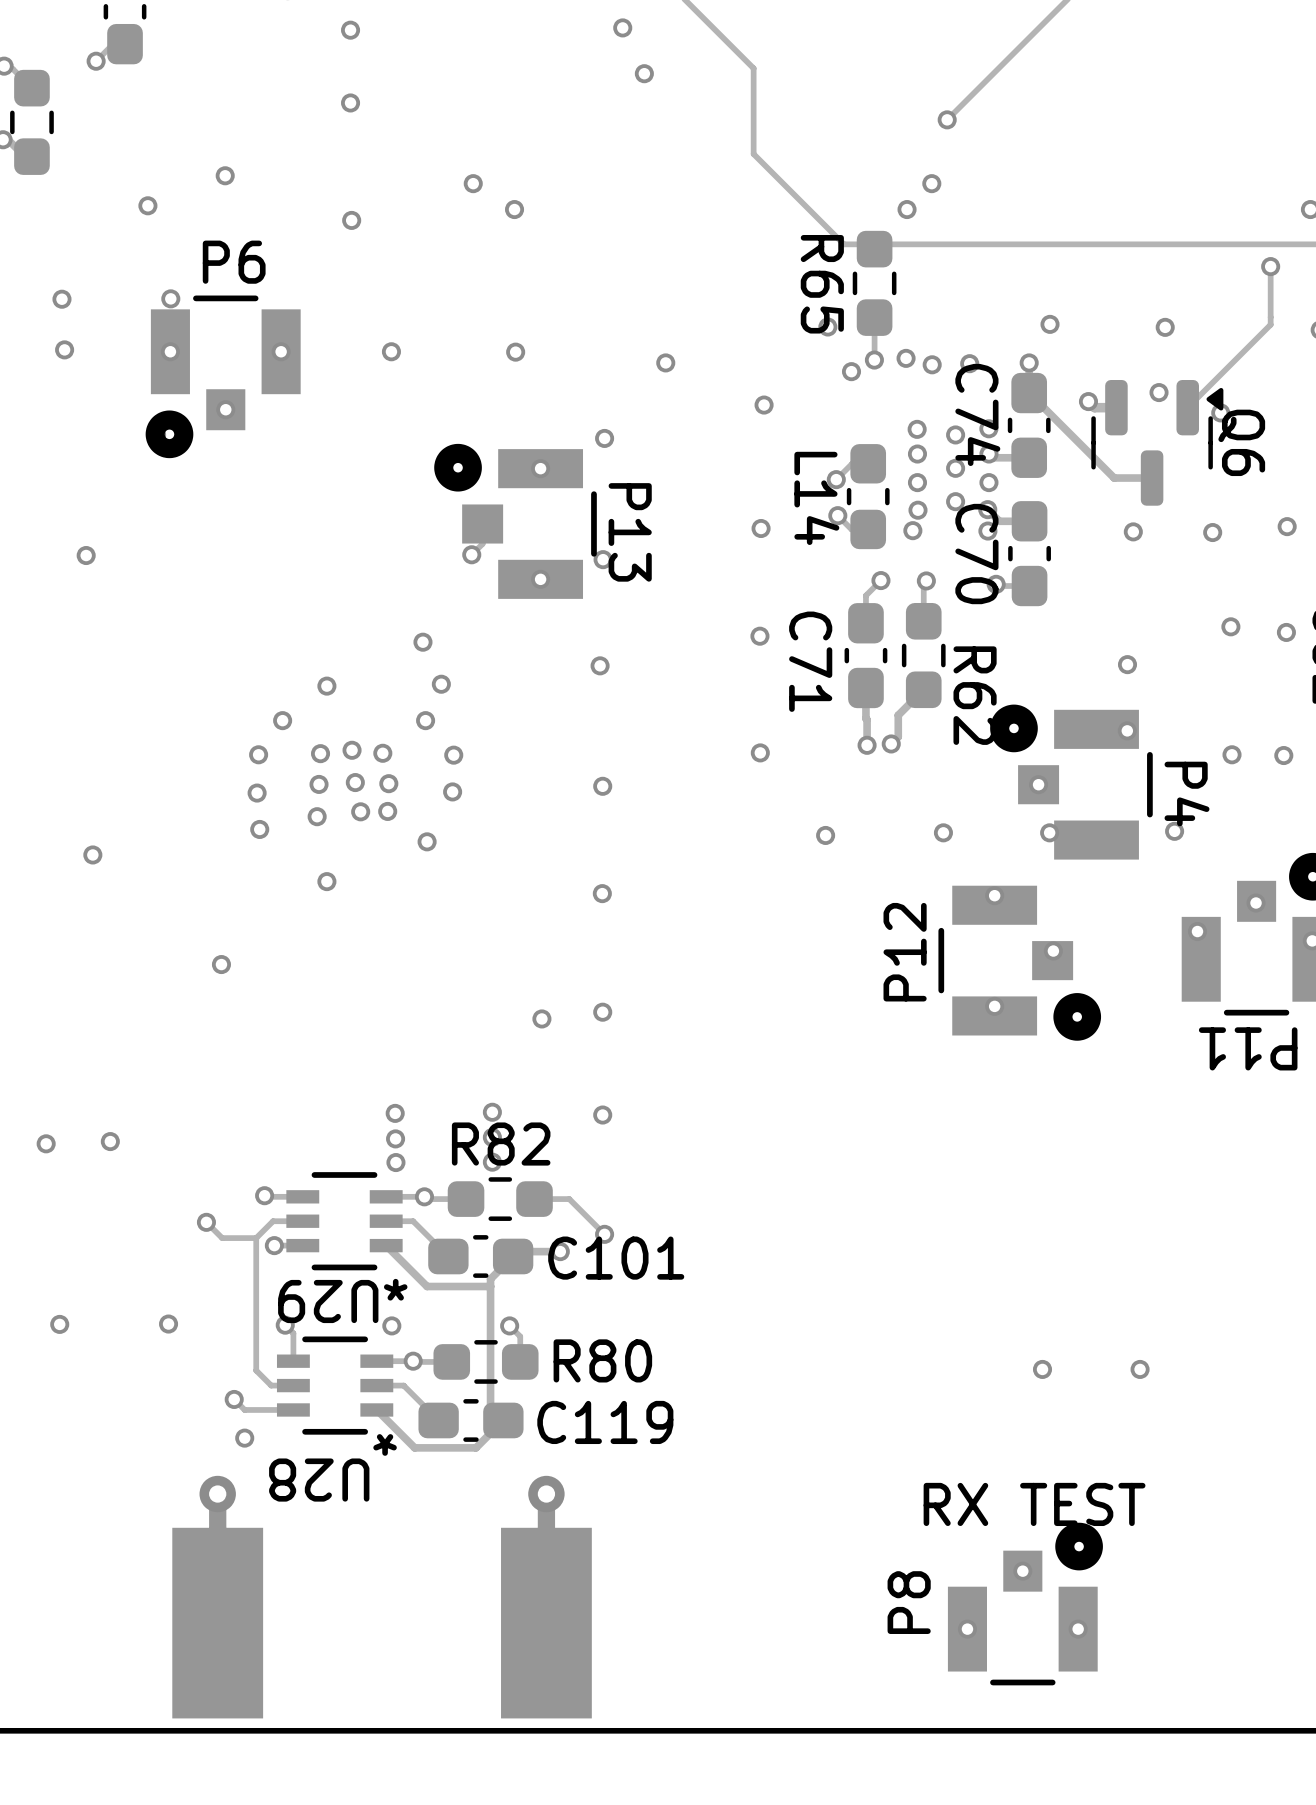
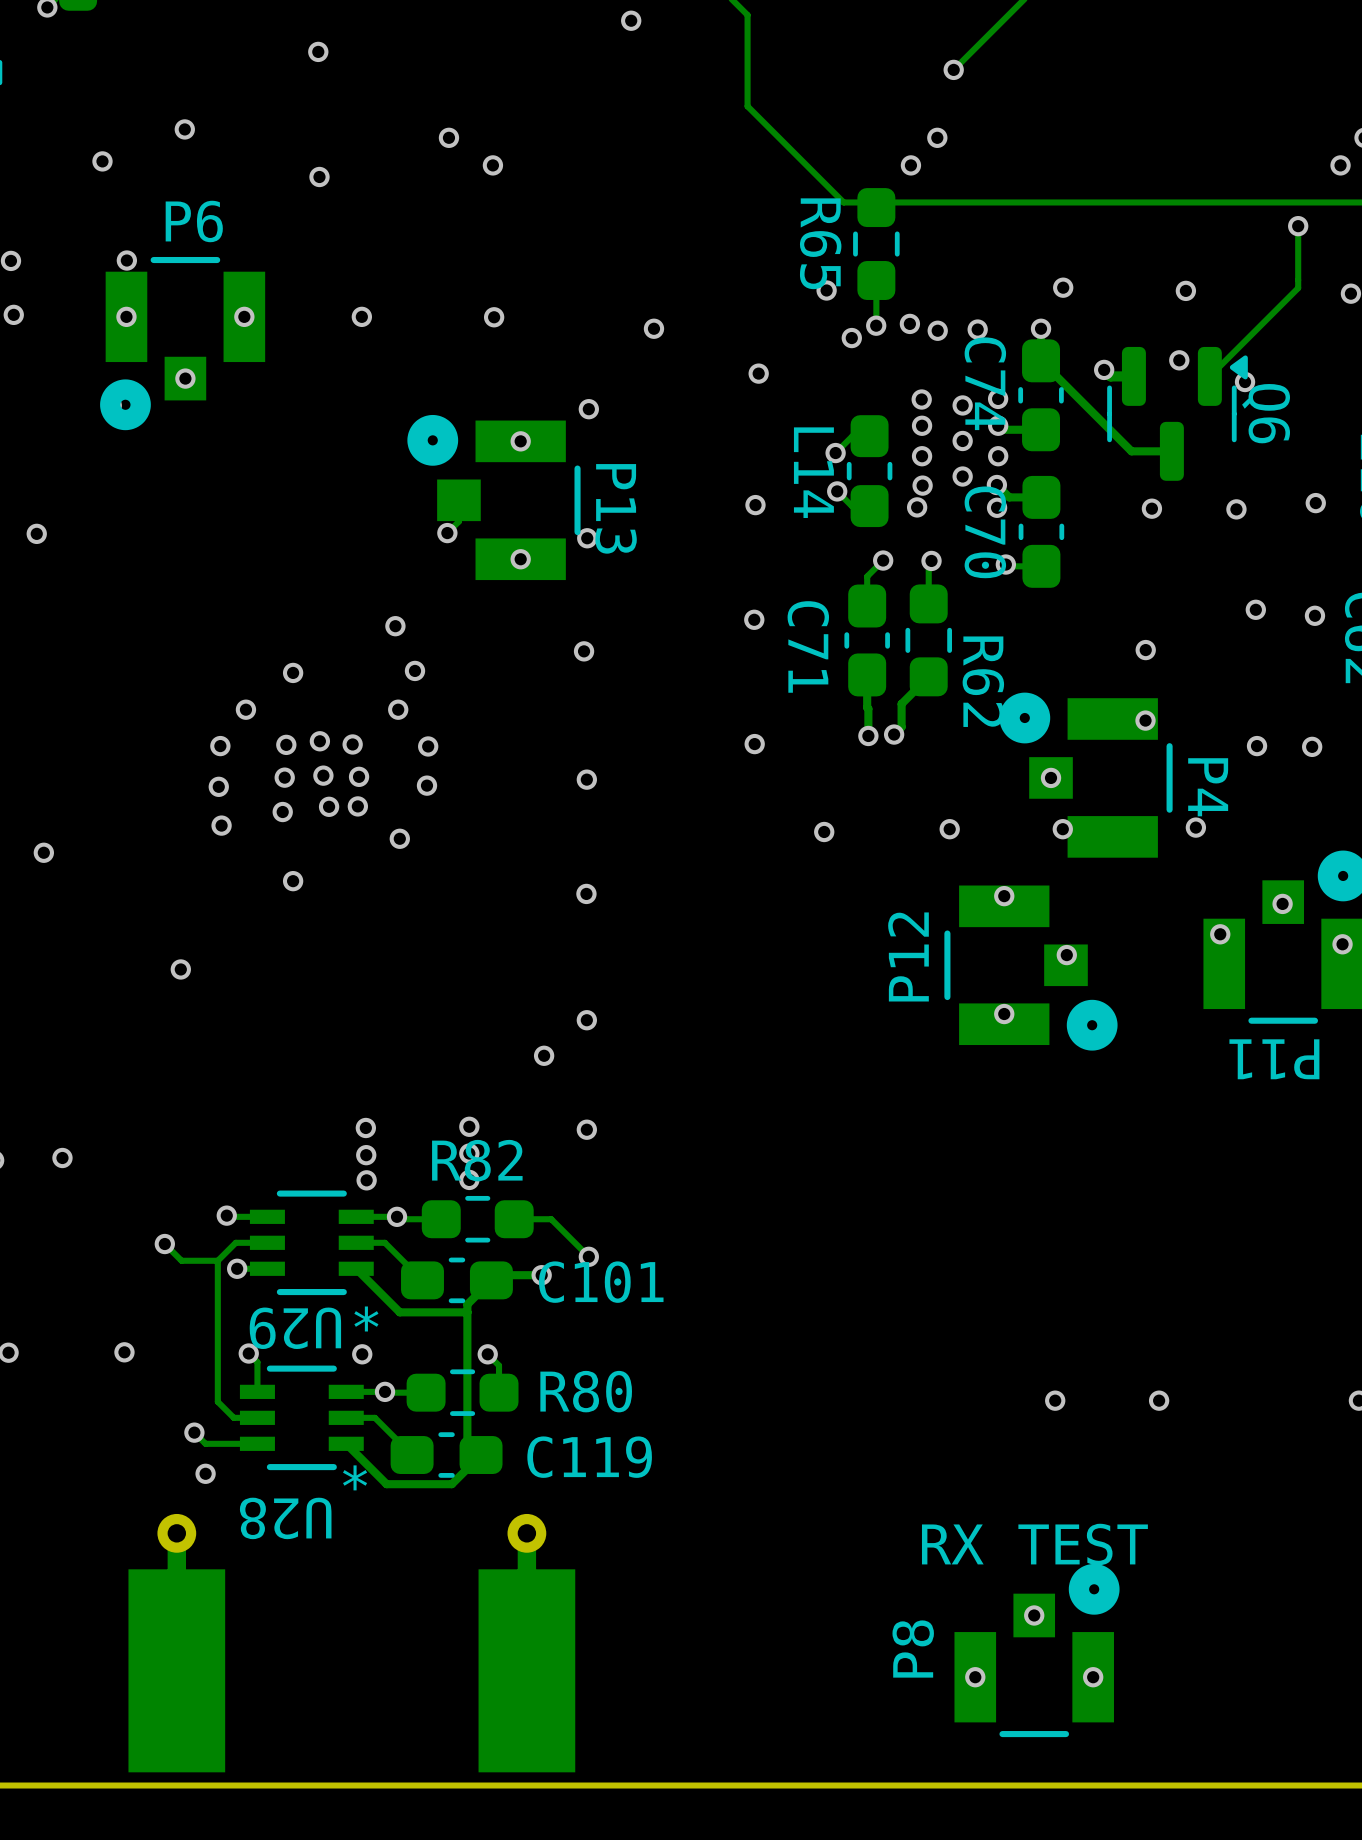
via position: (541, 1018) -> (544, 1055)

